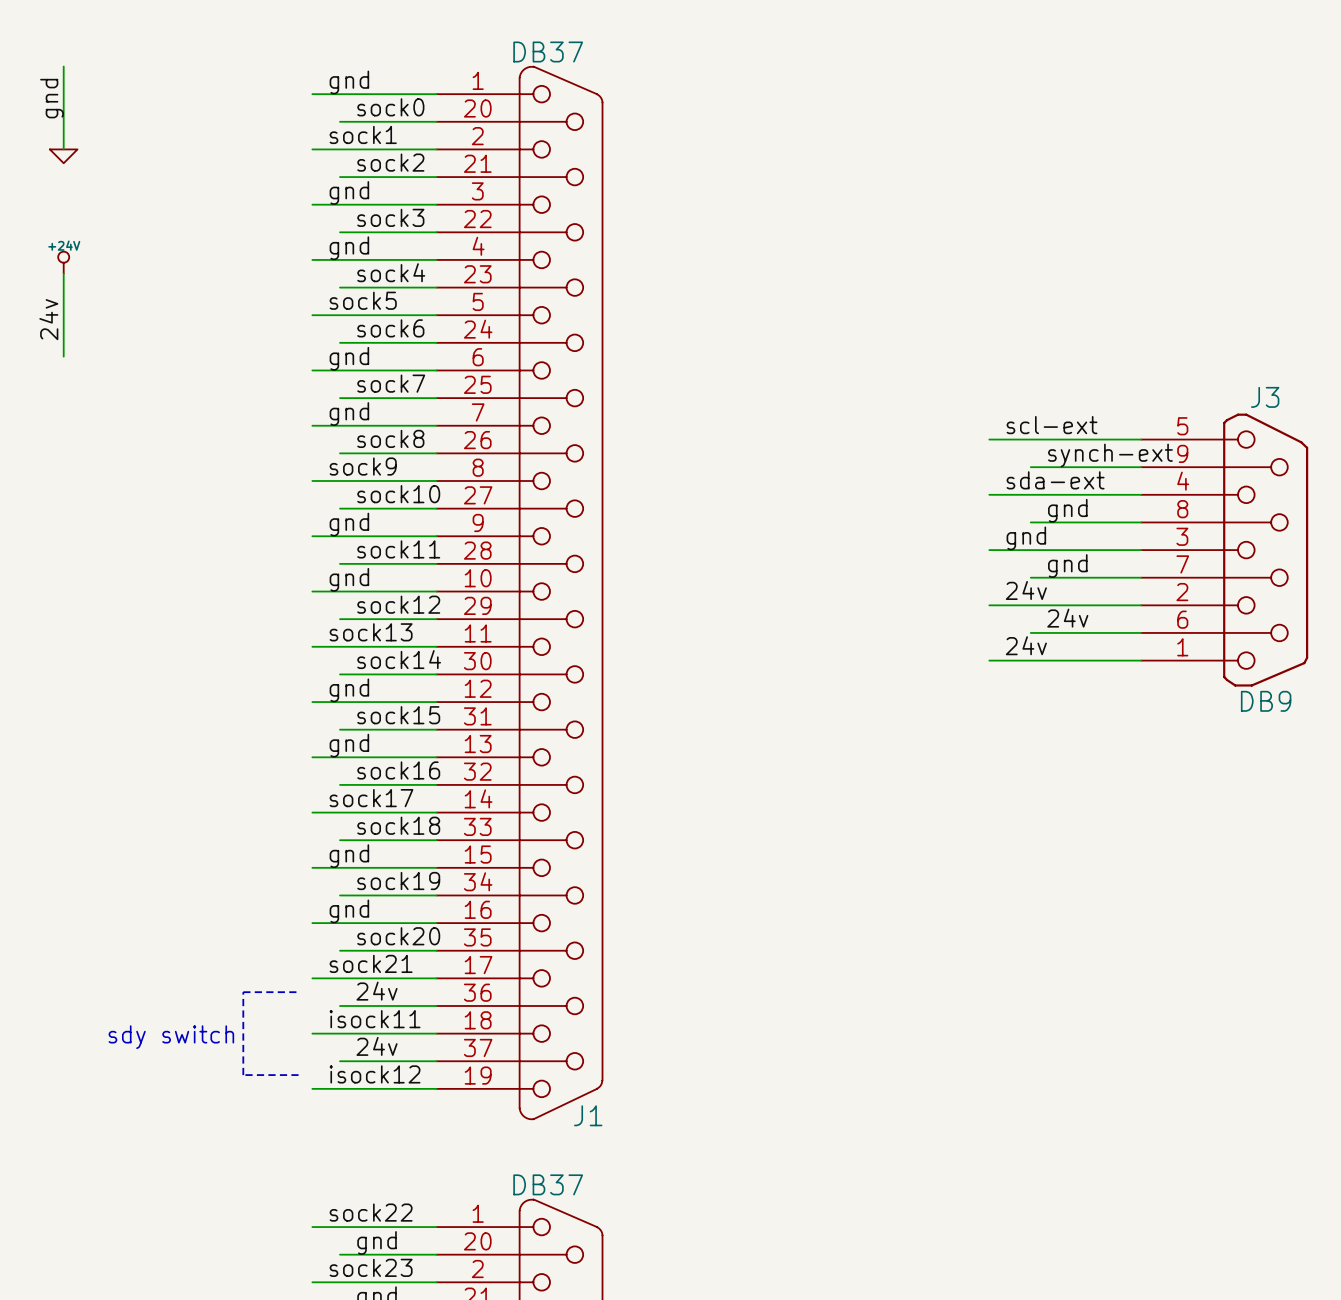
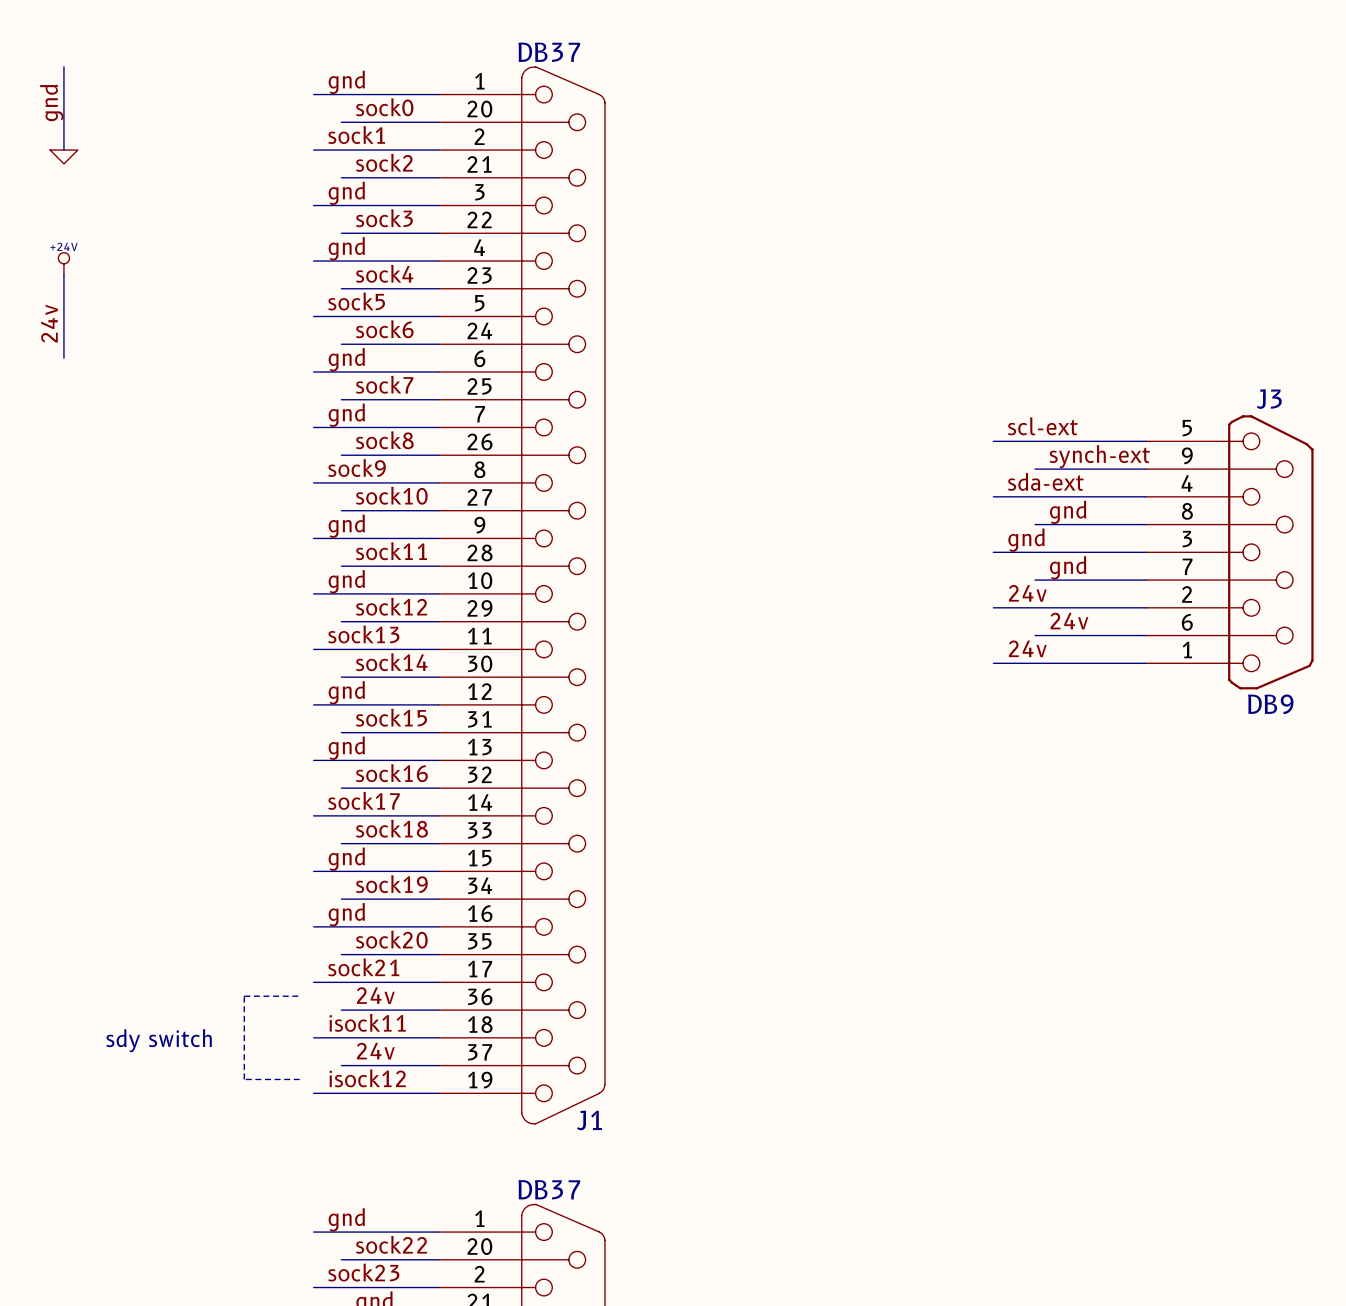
label: sock22 (371, 1212) -> gnd (346, 1219)
label: gnd (377, 1242) -> sock22 (391, 1244)

